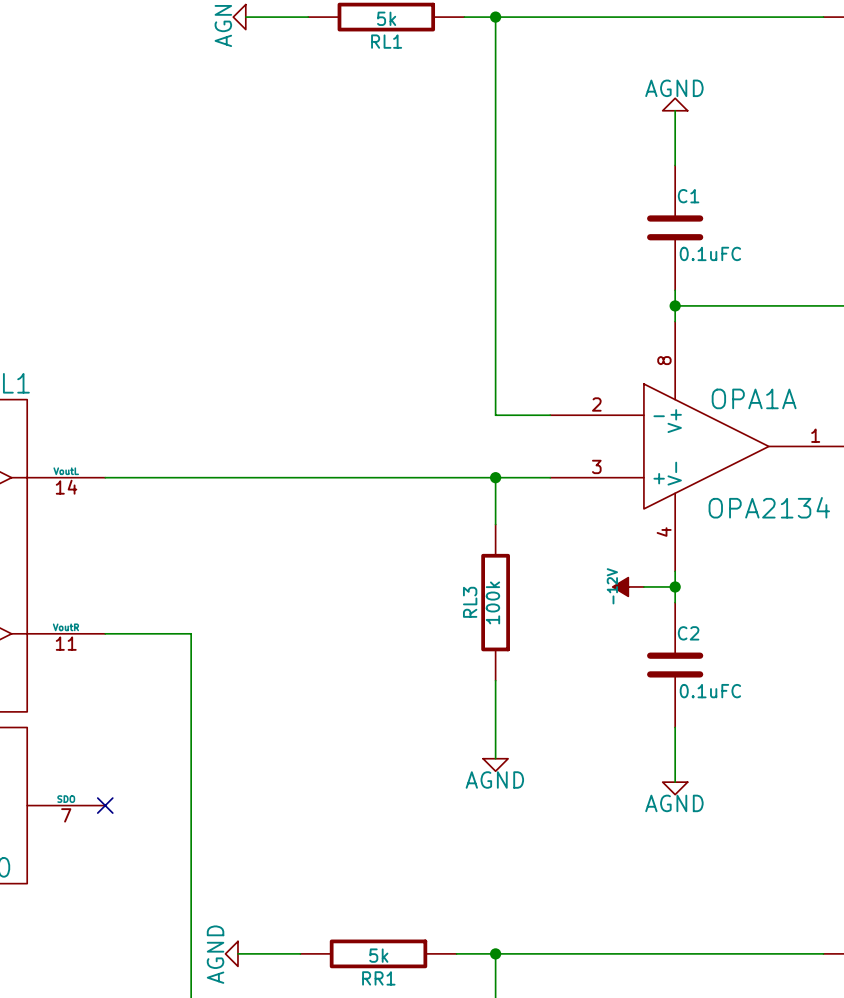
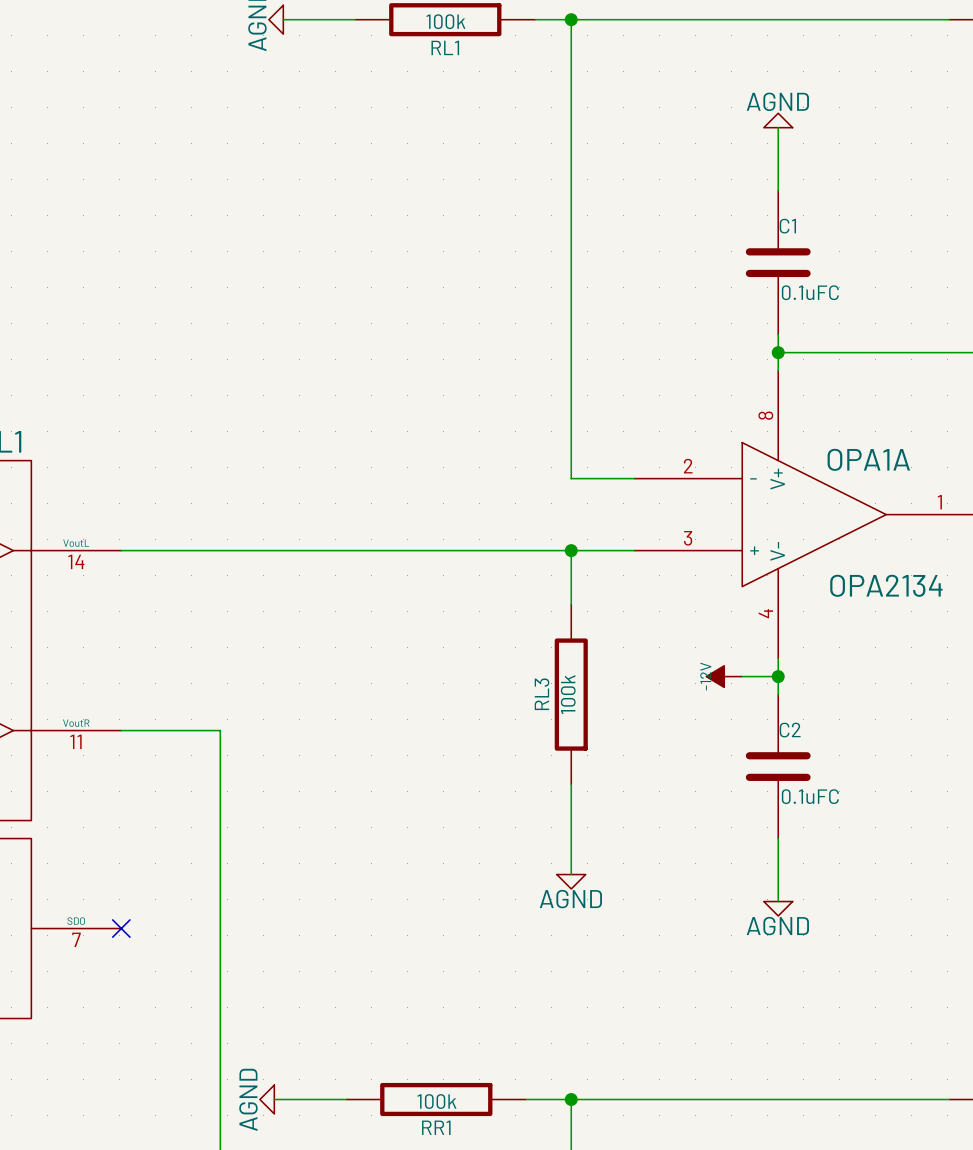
RL1 value: 5k (386, 18) -> 100k (445, 21)
RR1 value: 5k (378, 955) -> 100k (436, 1101)

